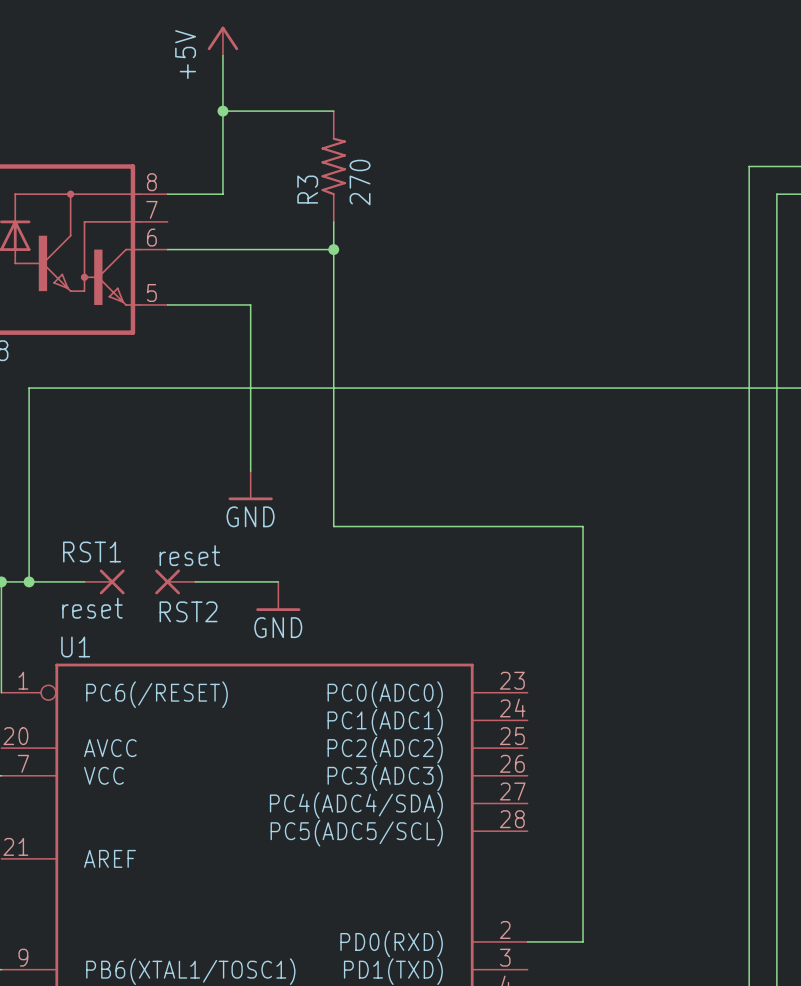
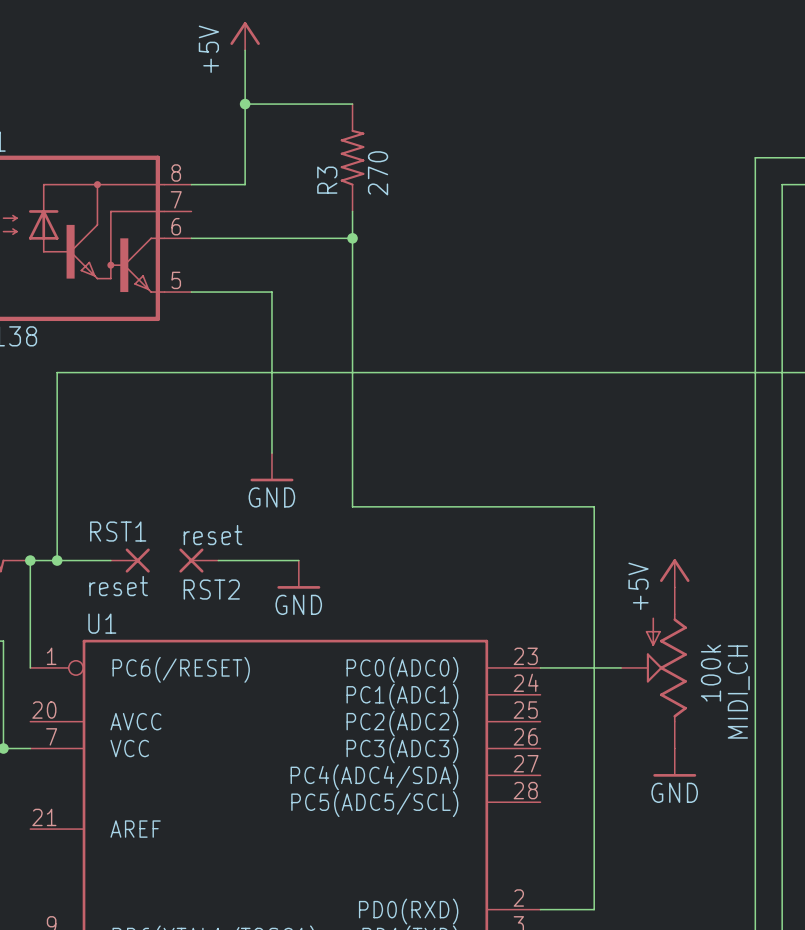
power symbol: none -> +5V (674, 573)
wire: none -> (540, 667) (621, 667)
MIDI_CH: none -> 100k (653, 667)
power symbol: none -> GND (674, 762)

